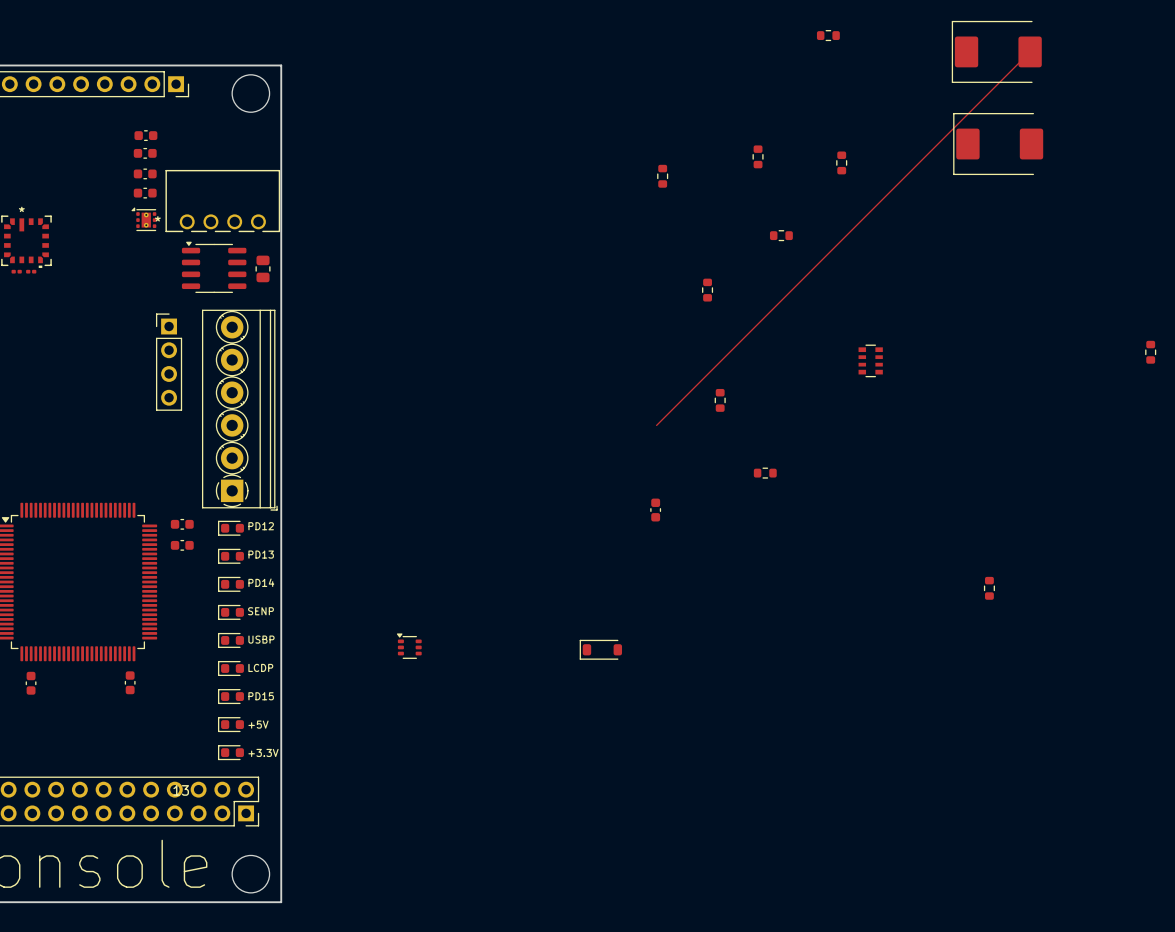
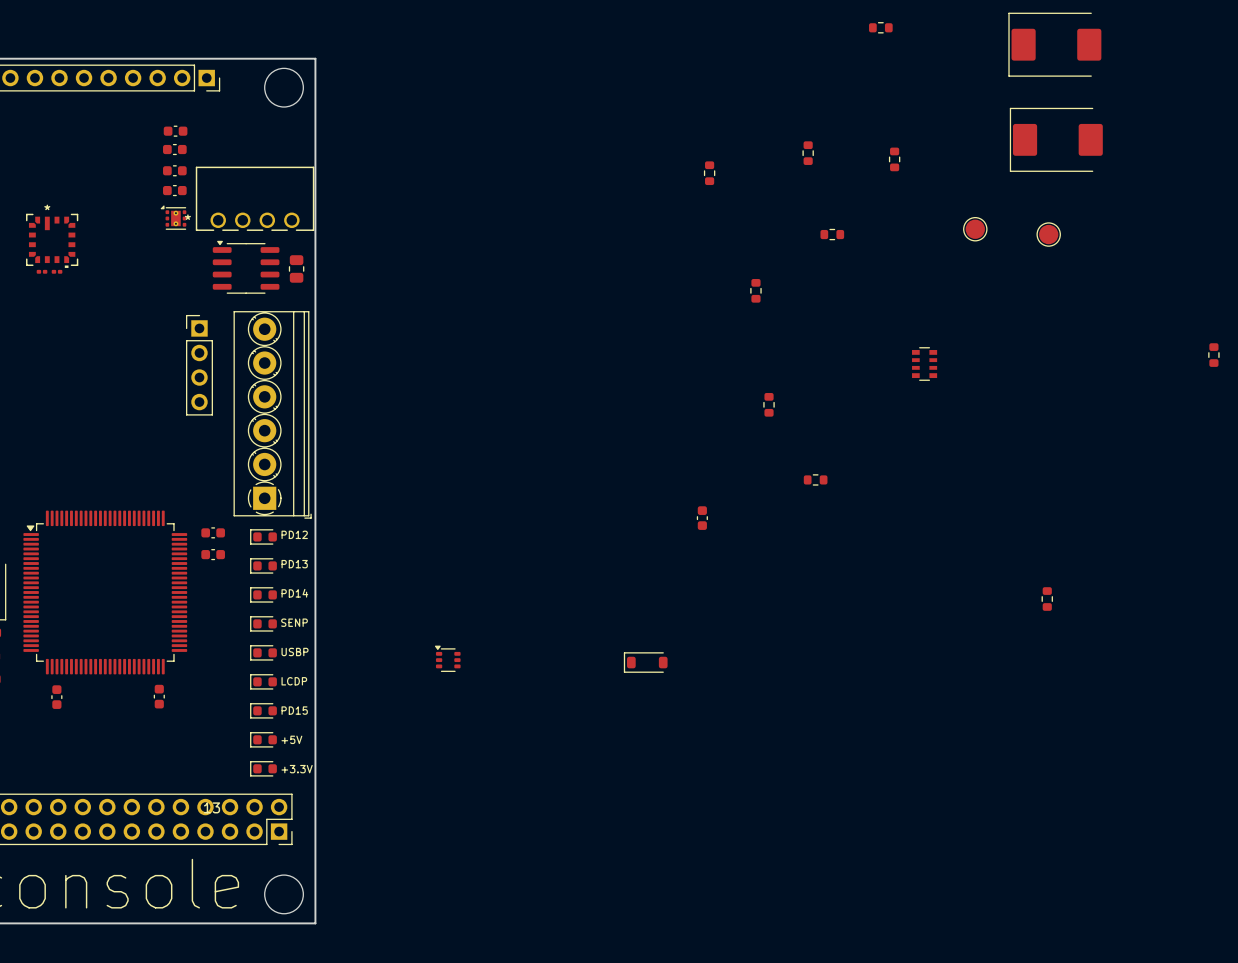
track: (1030, 51) (656, 425) -> none
part: none -> (975, 229)
part: none -> (1048, 234)

